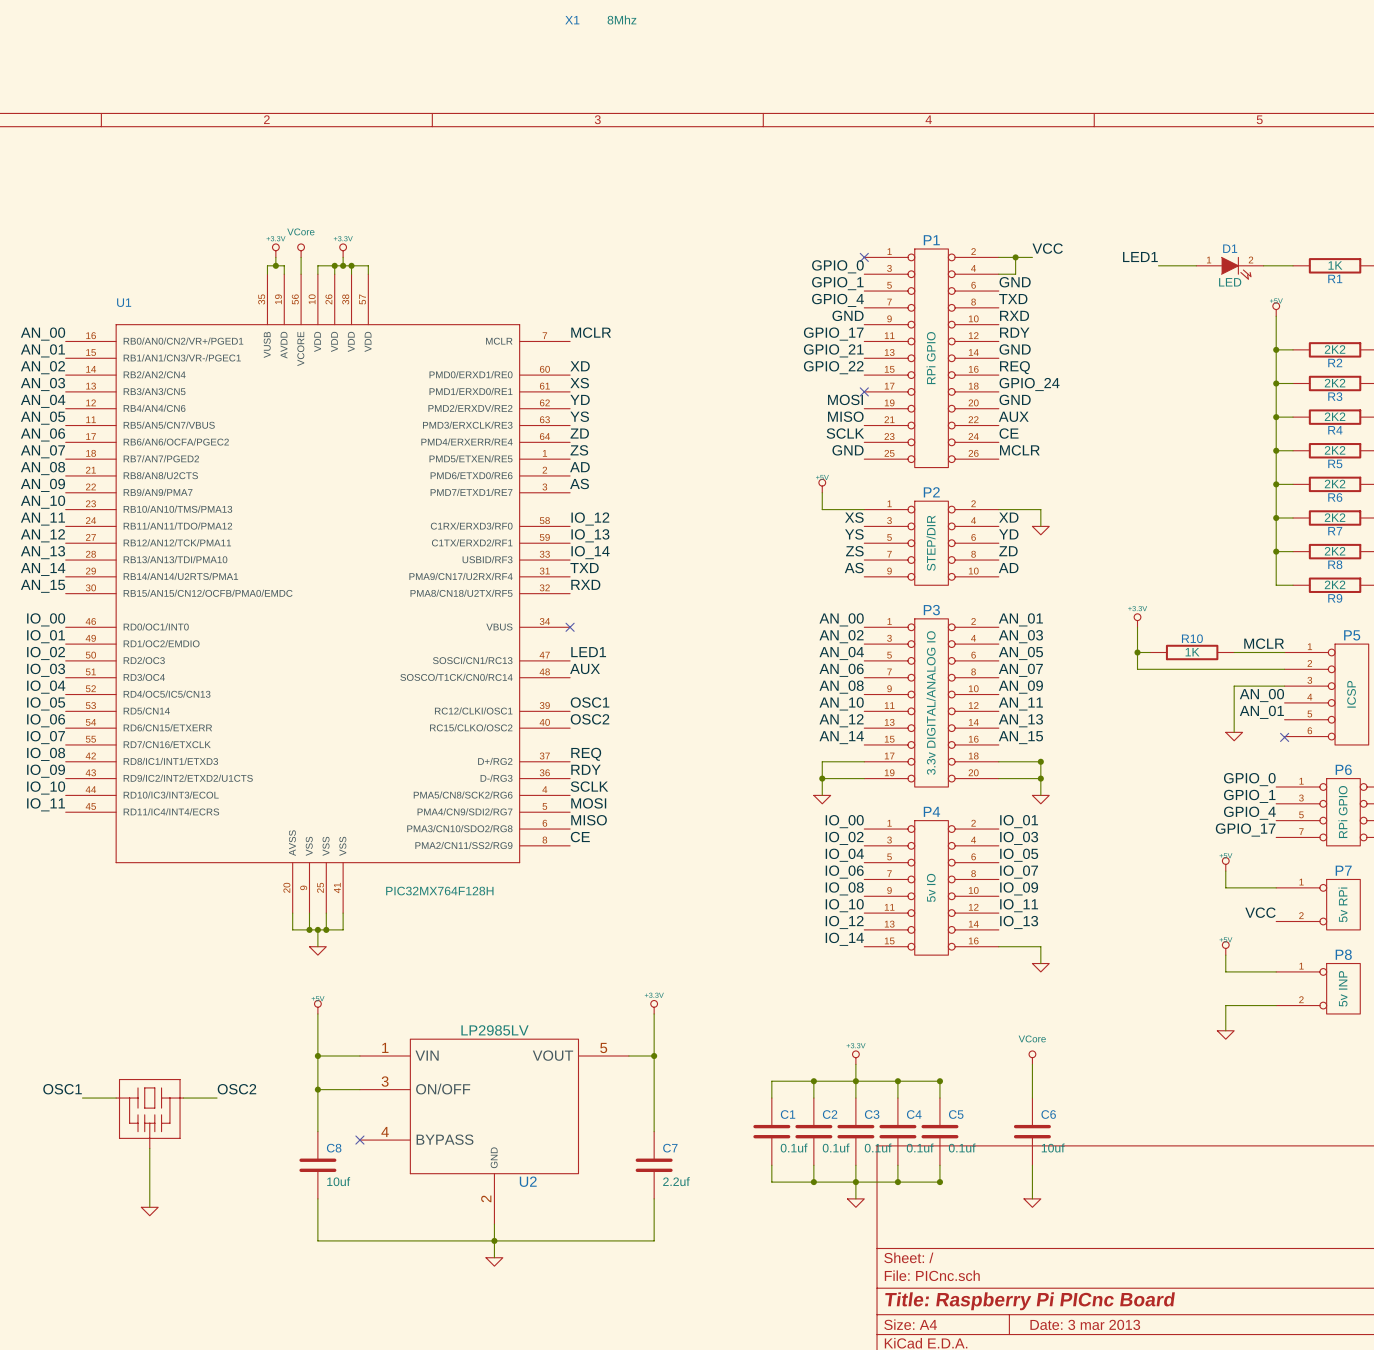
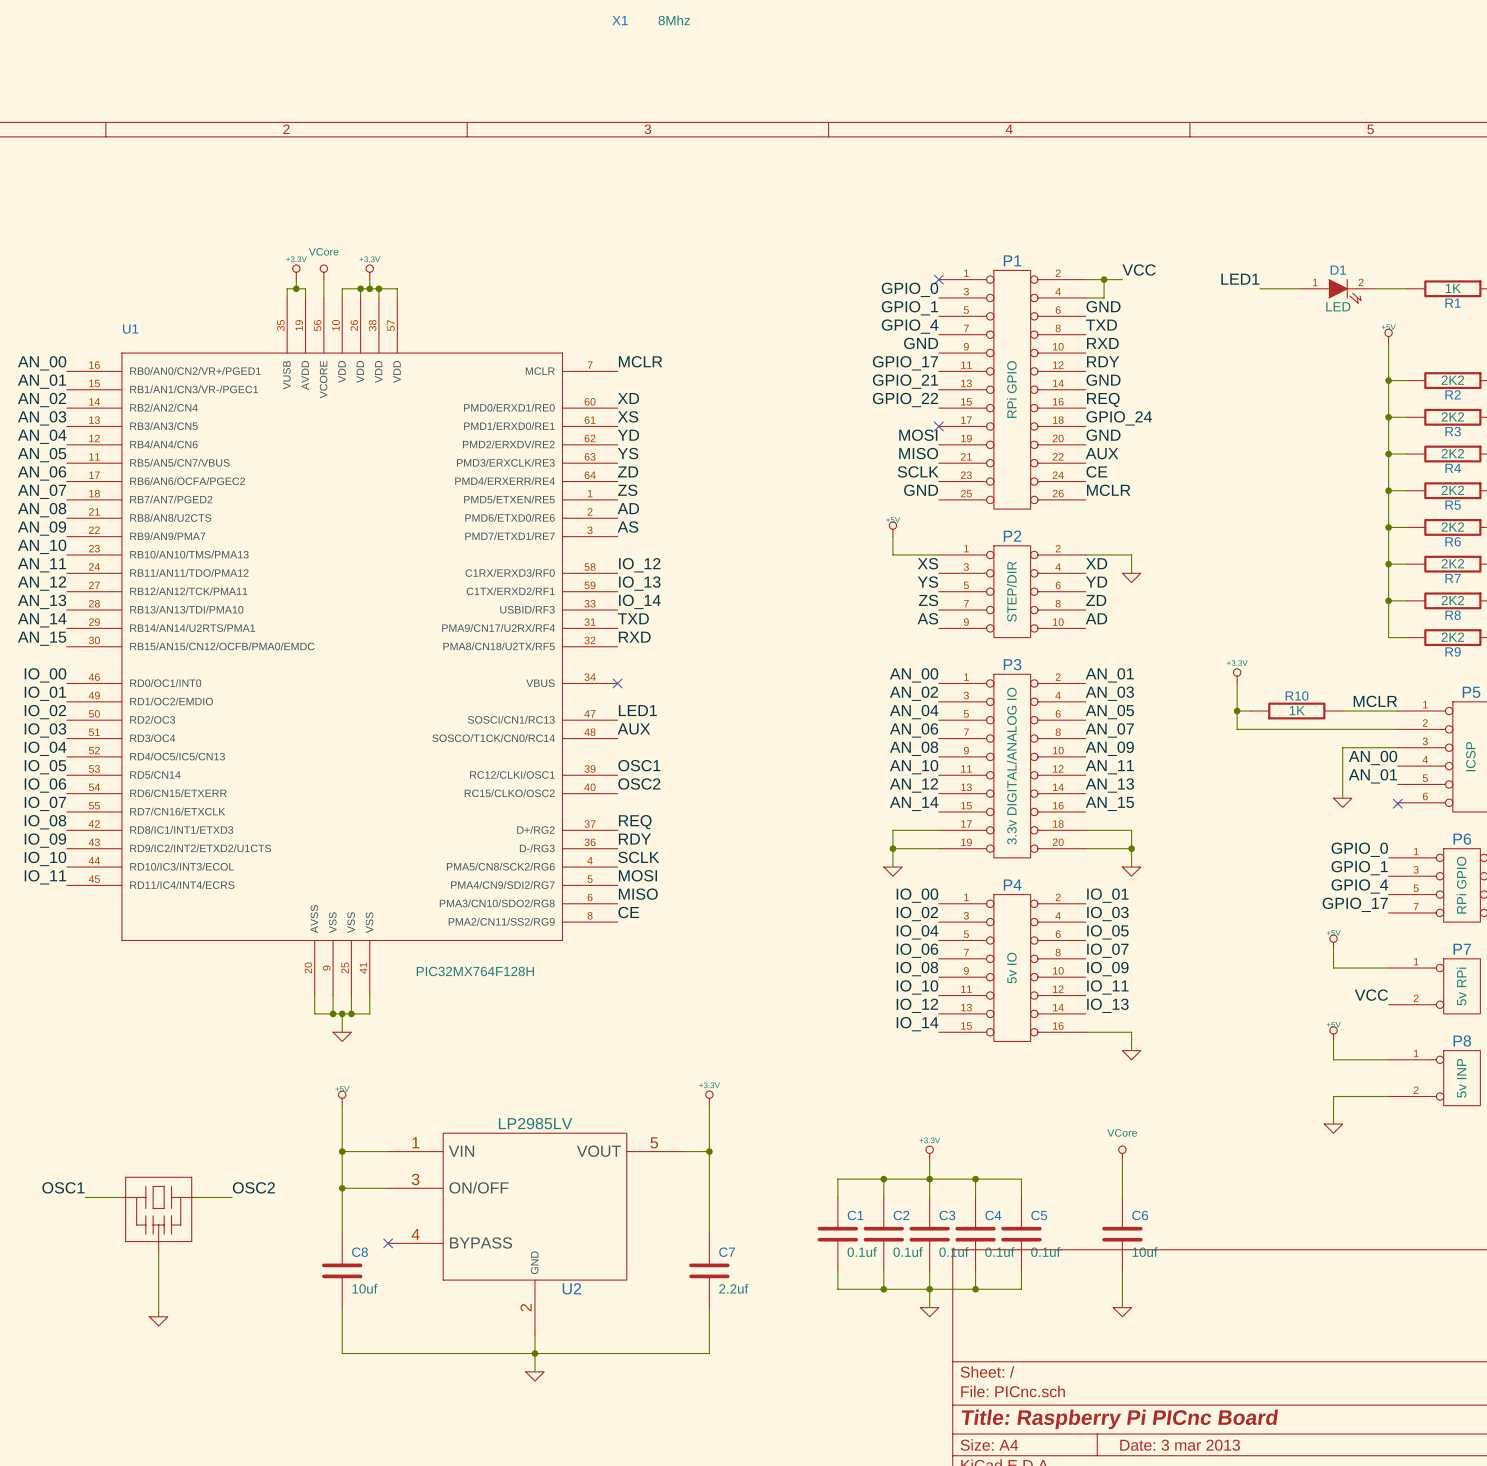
junction: (1040, 761) -> none
junction: (939, 1081) -> none
junction: (939, 1182) -> none

